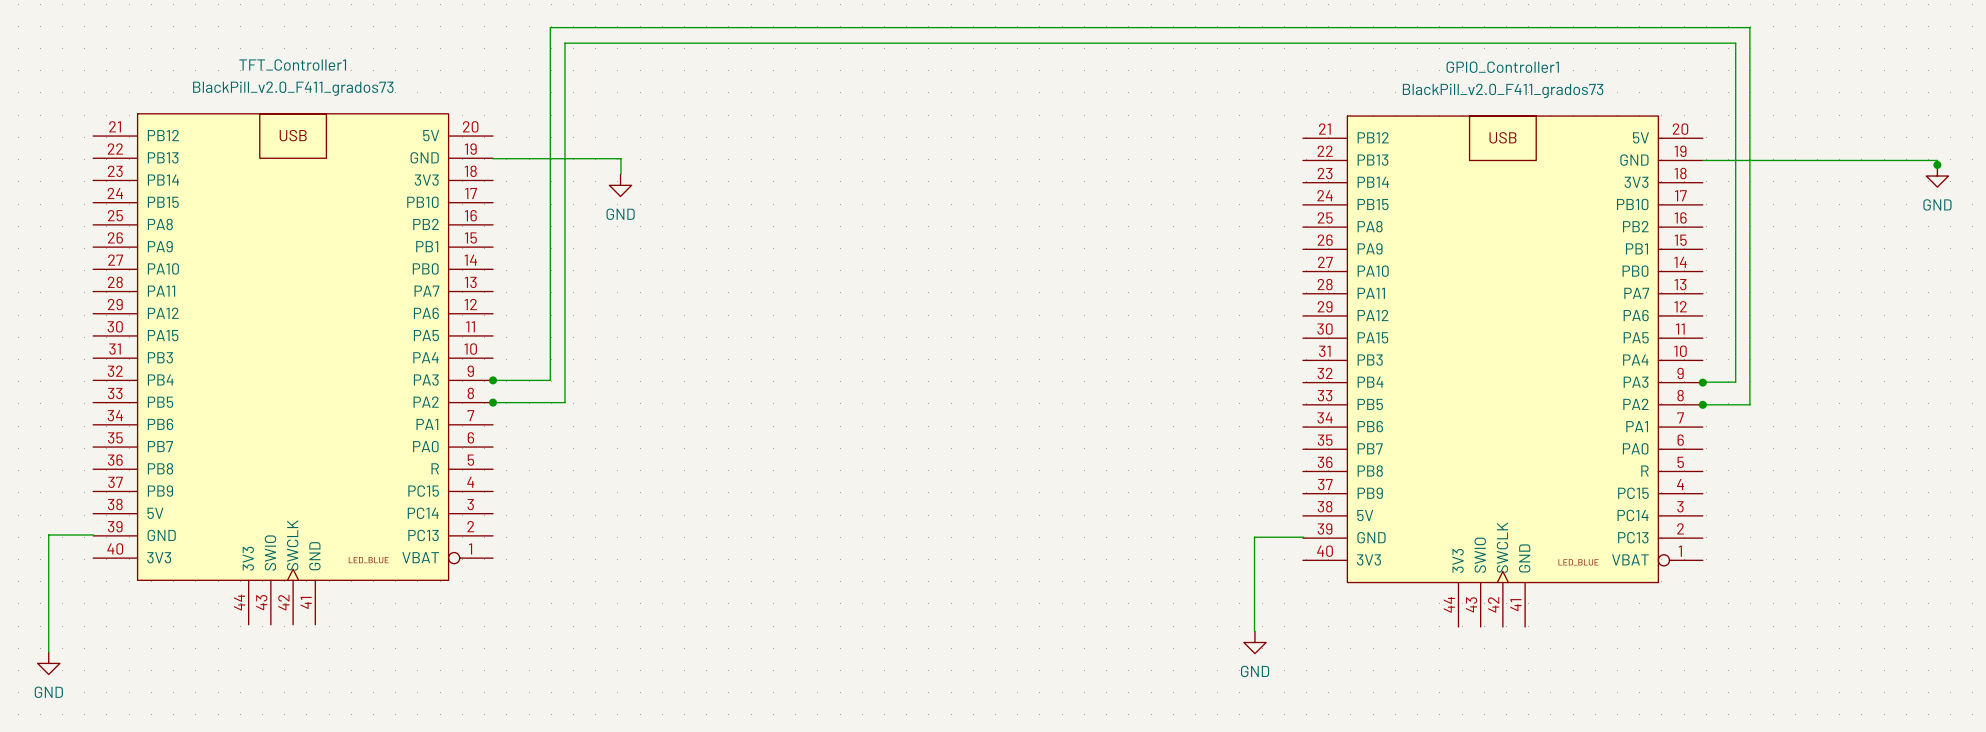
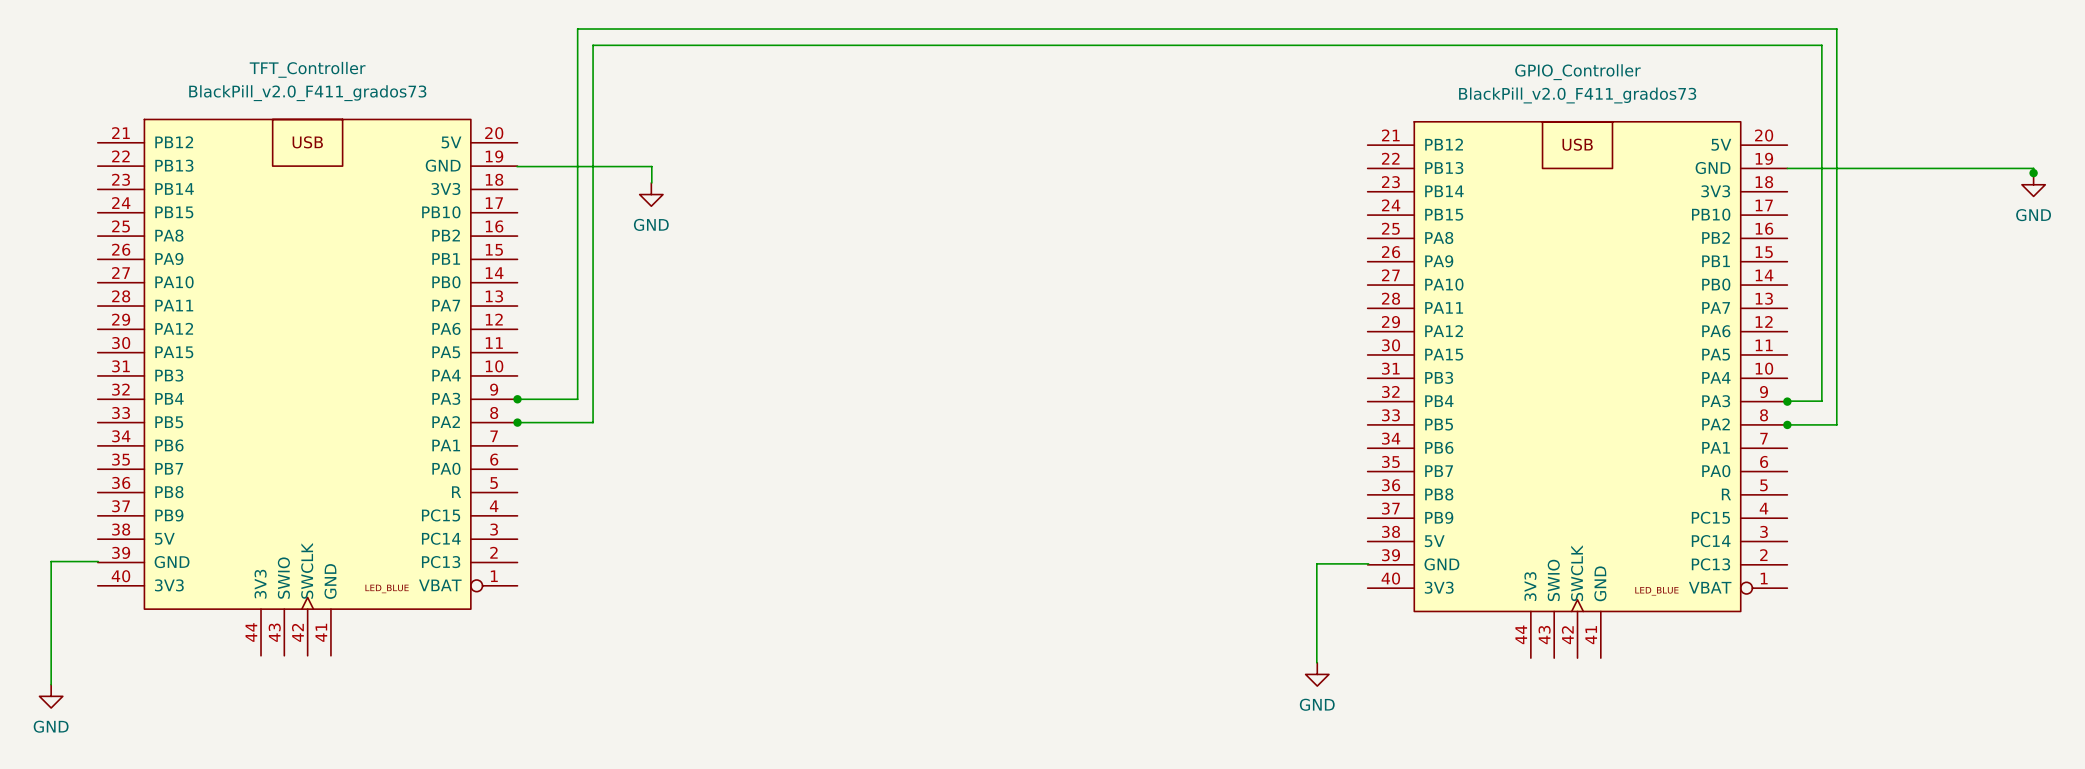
TFT_Controller1 name: TFT_Controller1 (292, 64) -> TFT_Controller (307, 69)
GPIO_Controller1 name: GPIO_Controller1 (1502, 67) -> GPIO_Controller (1577, 72)

